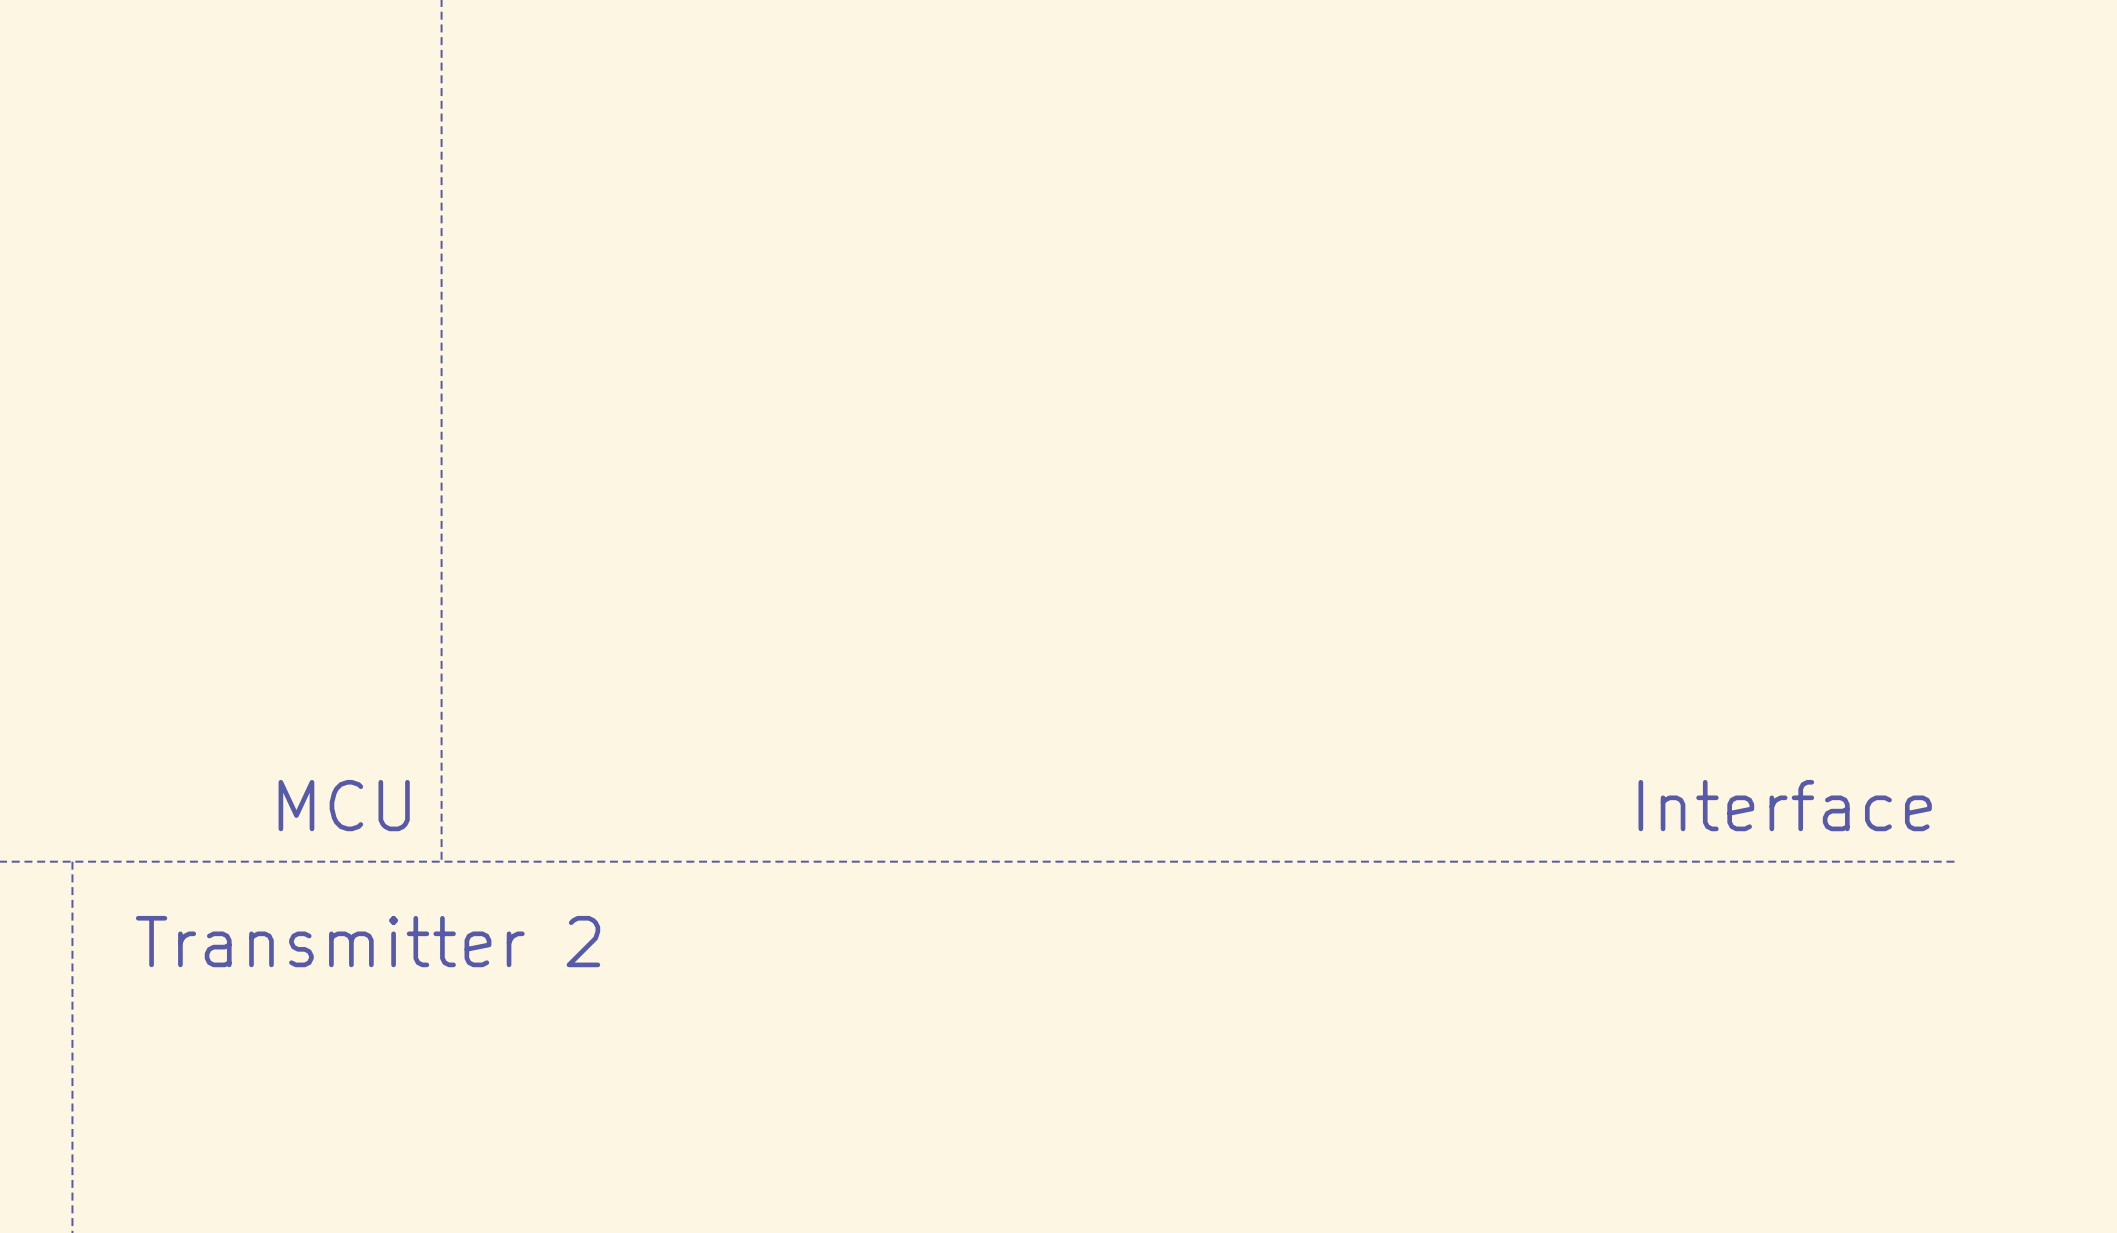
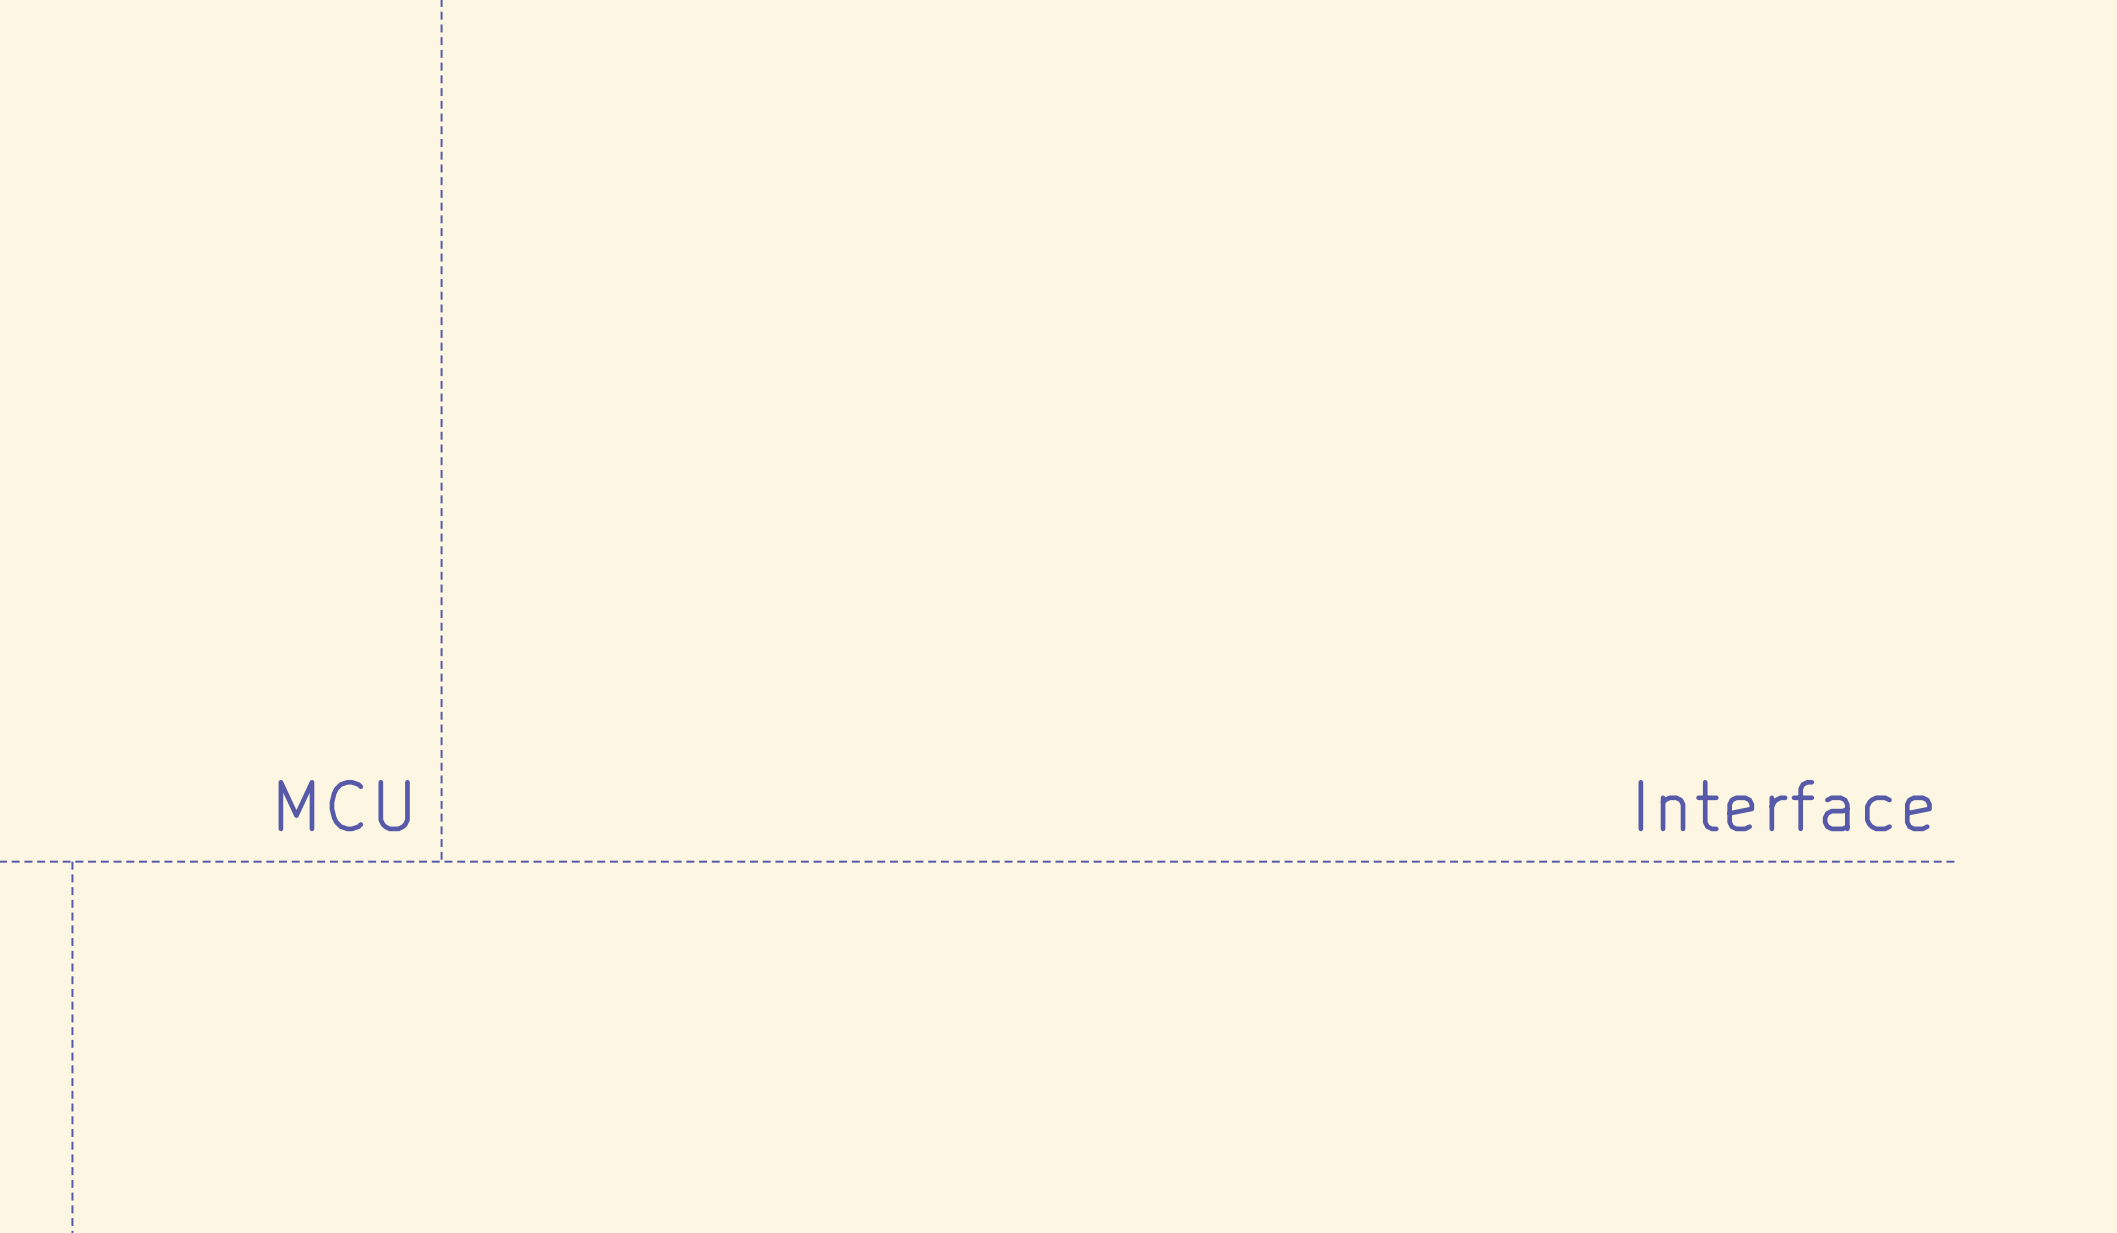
text: Transmitter 2 (368, 941) -> none

